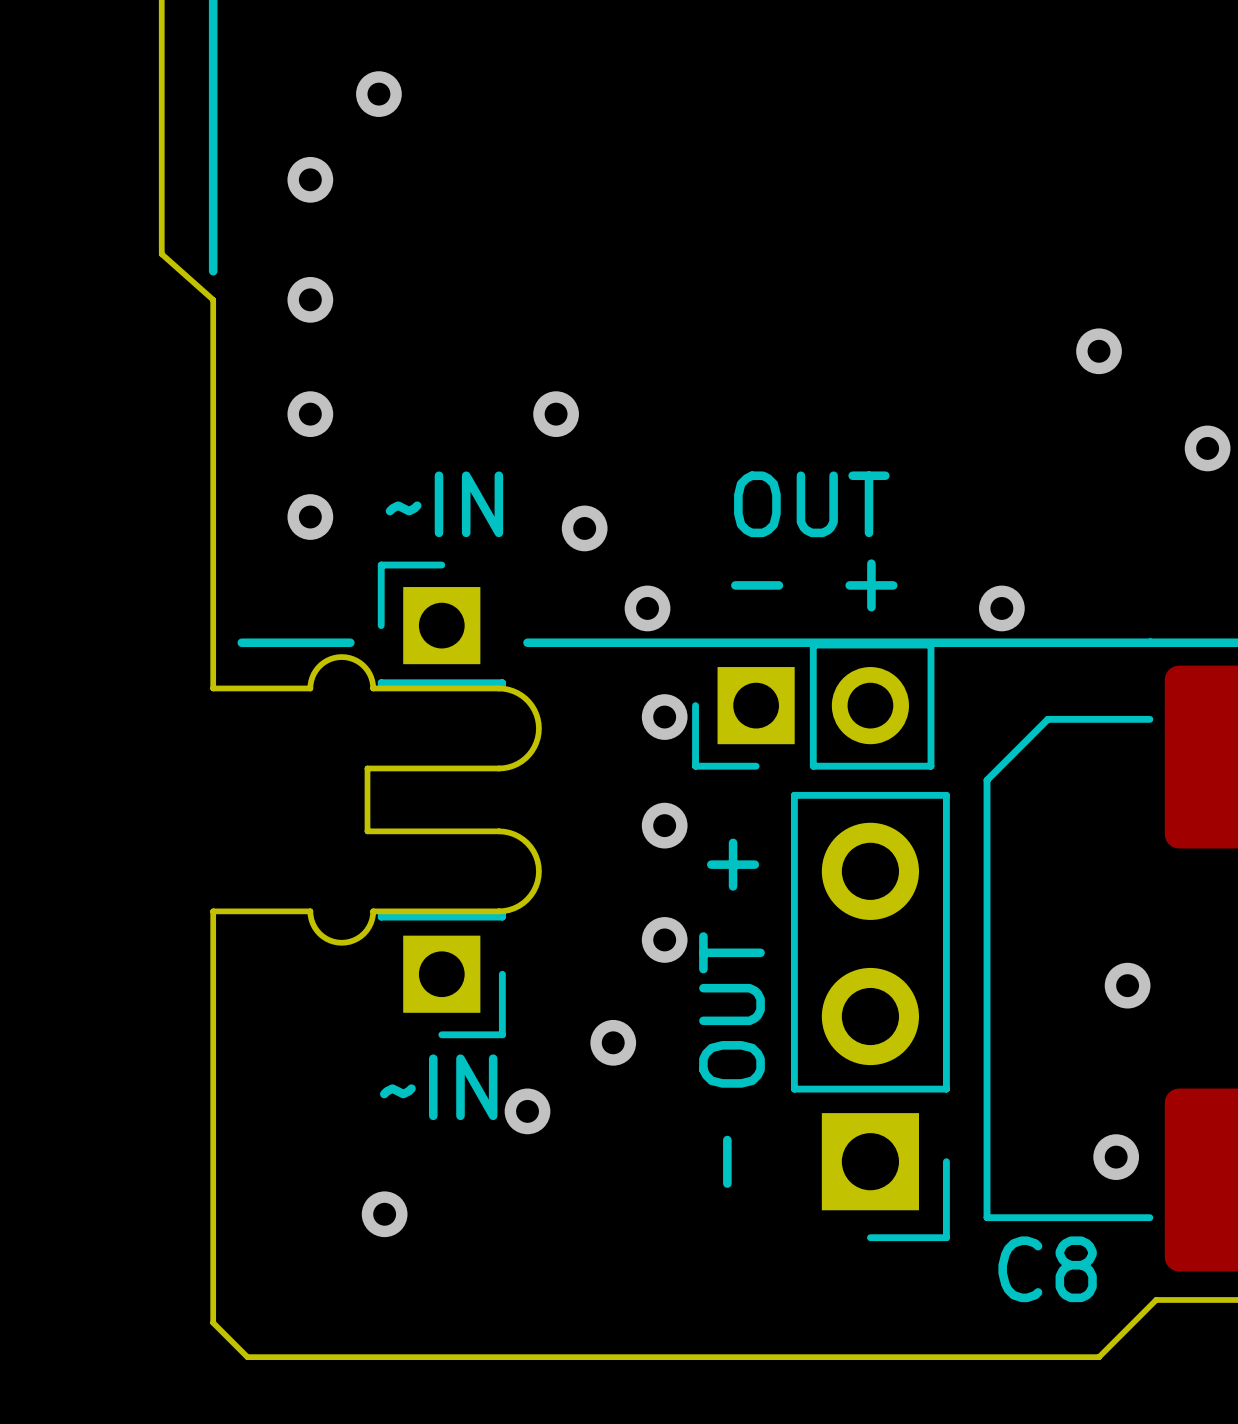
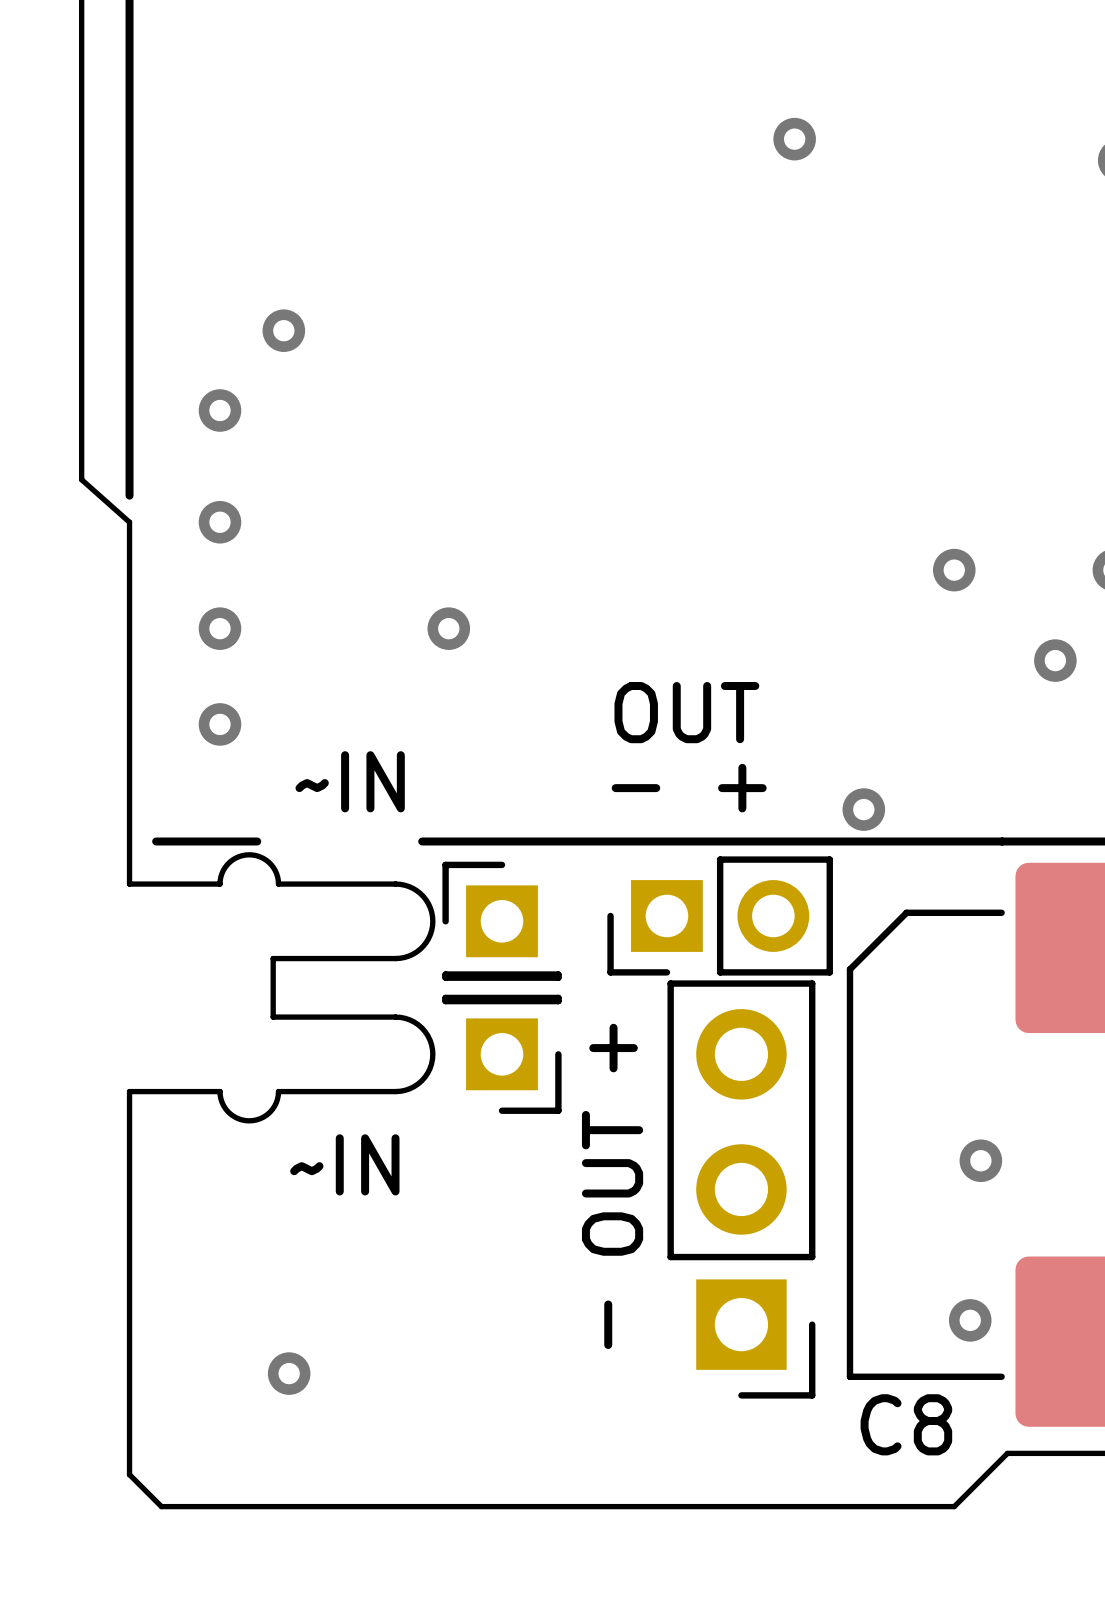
text position: ~IN (444, 504) -> ~IN (350, 781)
via: (584, 528) -> none
via: (647, 608) -> none
part: (441, 625) -> none
part position: (813, 705) -> (720, 915)
via: (664, 717) -> none
part: none -> (502, 921)
via: (664, 825) -> none
part: none -> (502, 1054)
via: (664, 939) -> none
part: (441, 974) -> none
via: (613, 1042) -> none
text position: ~IN (438, 1087) -> ~IN (344, 1164)
via: (527, 1111) -> none

